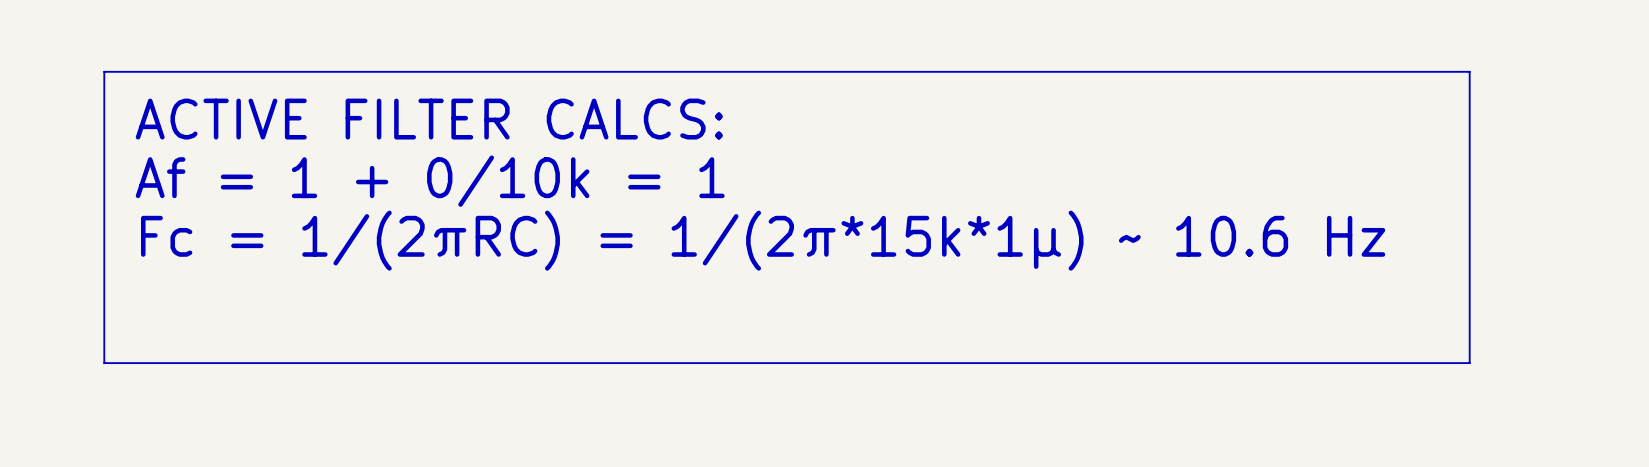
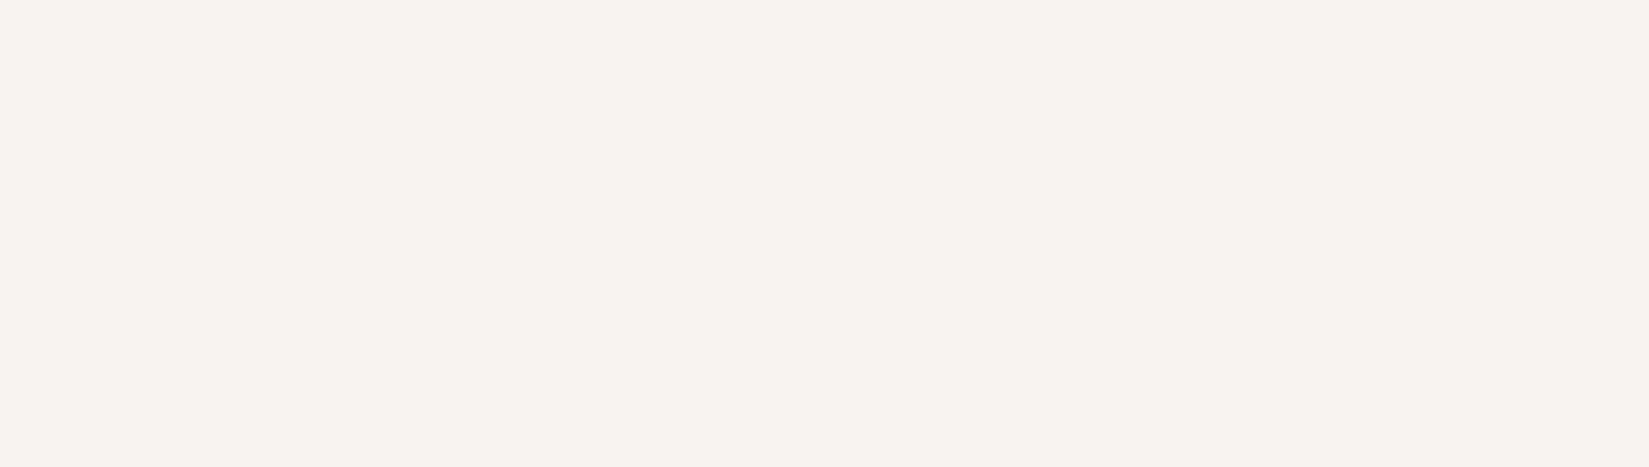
line: (104, 71) (1469, 71) (1469, 363) (104, 363) (104, 71) -> none
text: ACTIVE FILTER CALCS: (429, 119) -> none
text: Af = 1 + 0/10k = 1 (430, 181) -> none
text: Fc = 1/(2πRC) = 1/(2π*15k*1µ) ~ 10.6 Hz (763, 240) -> none

